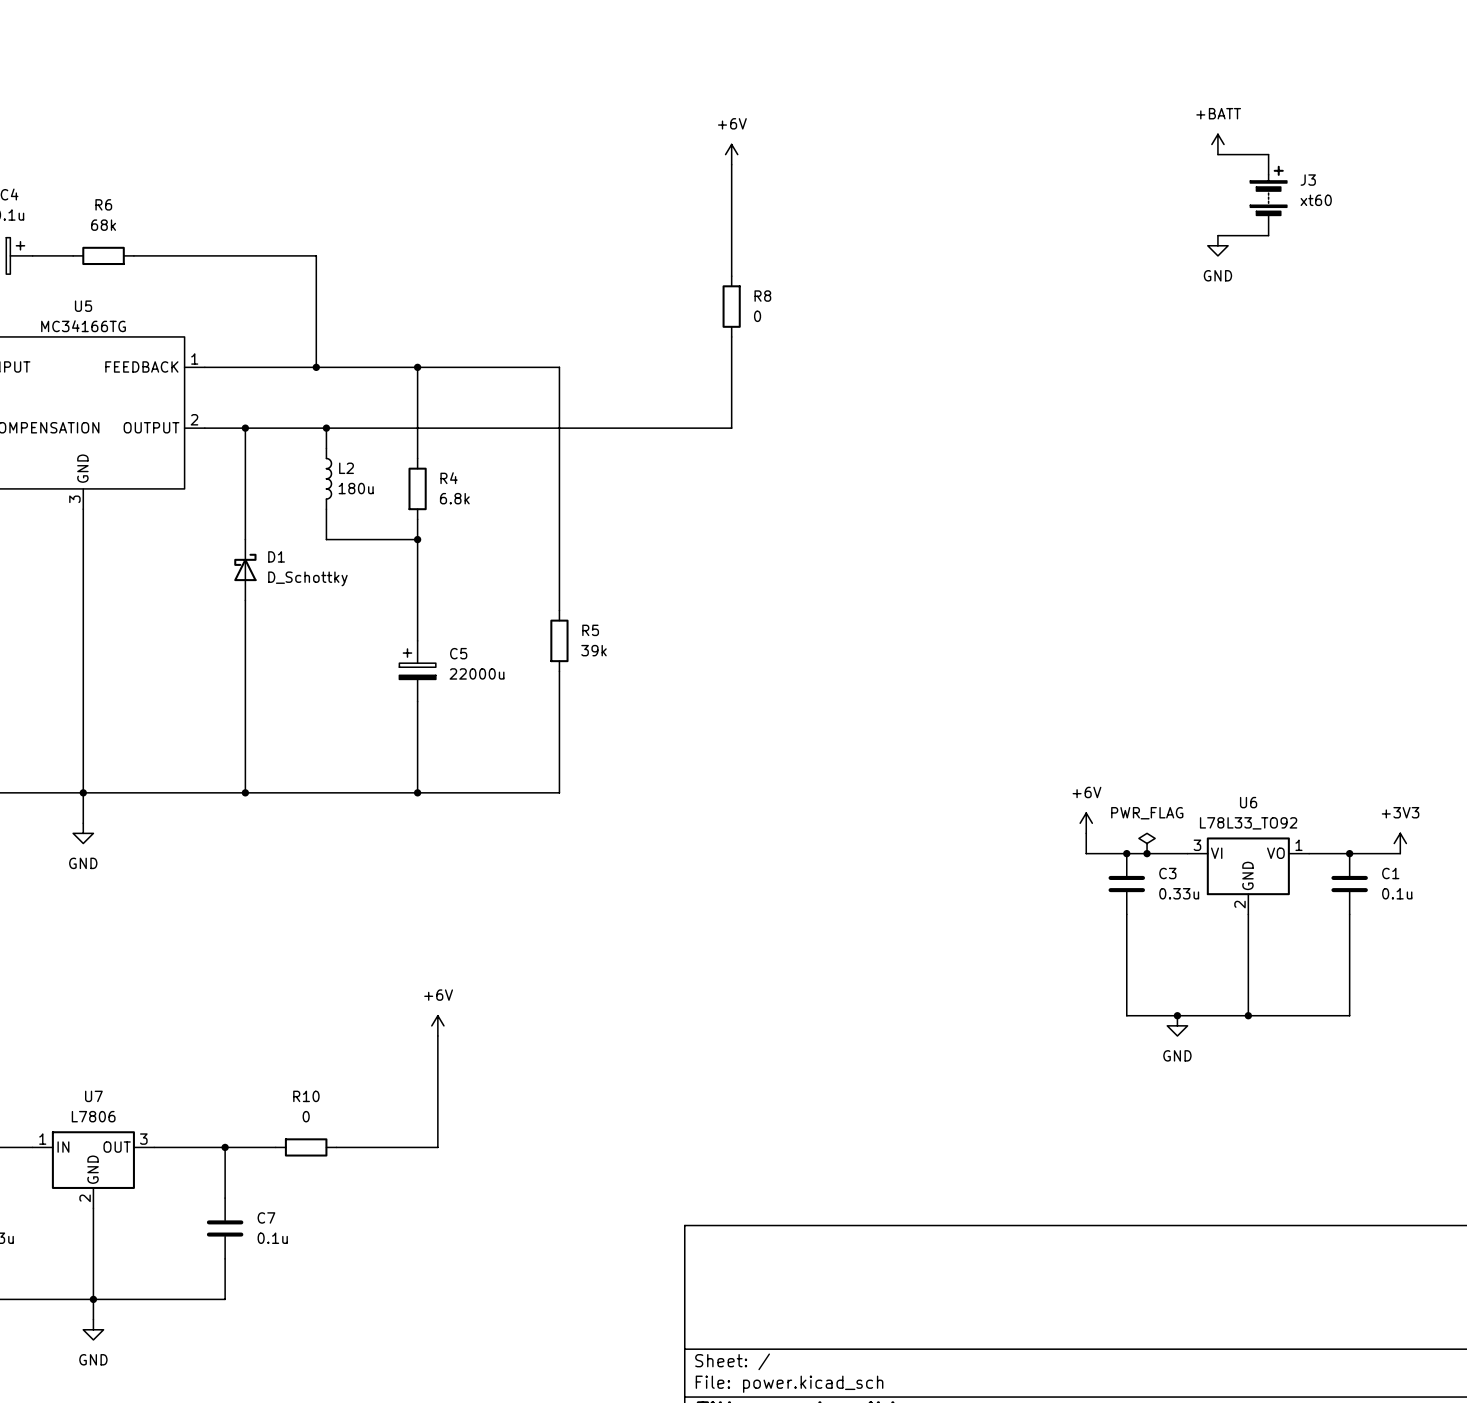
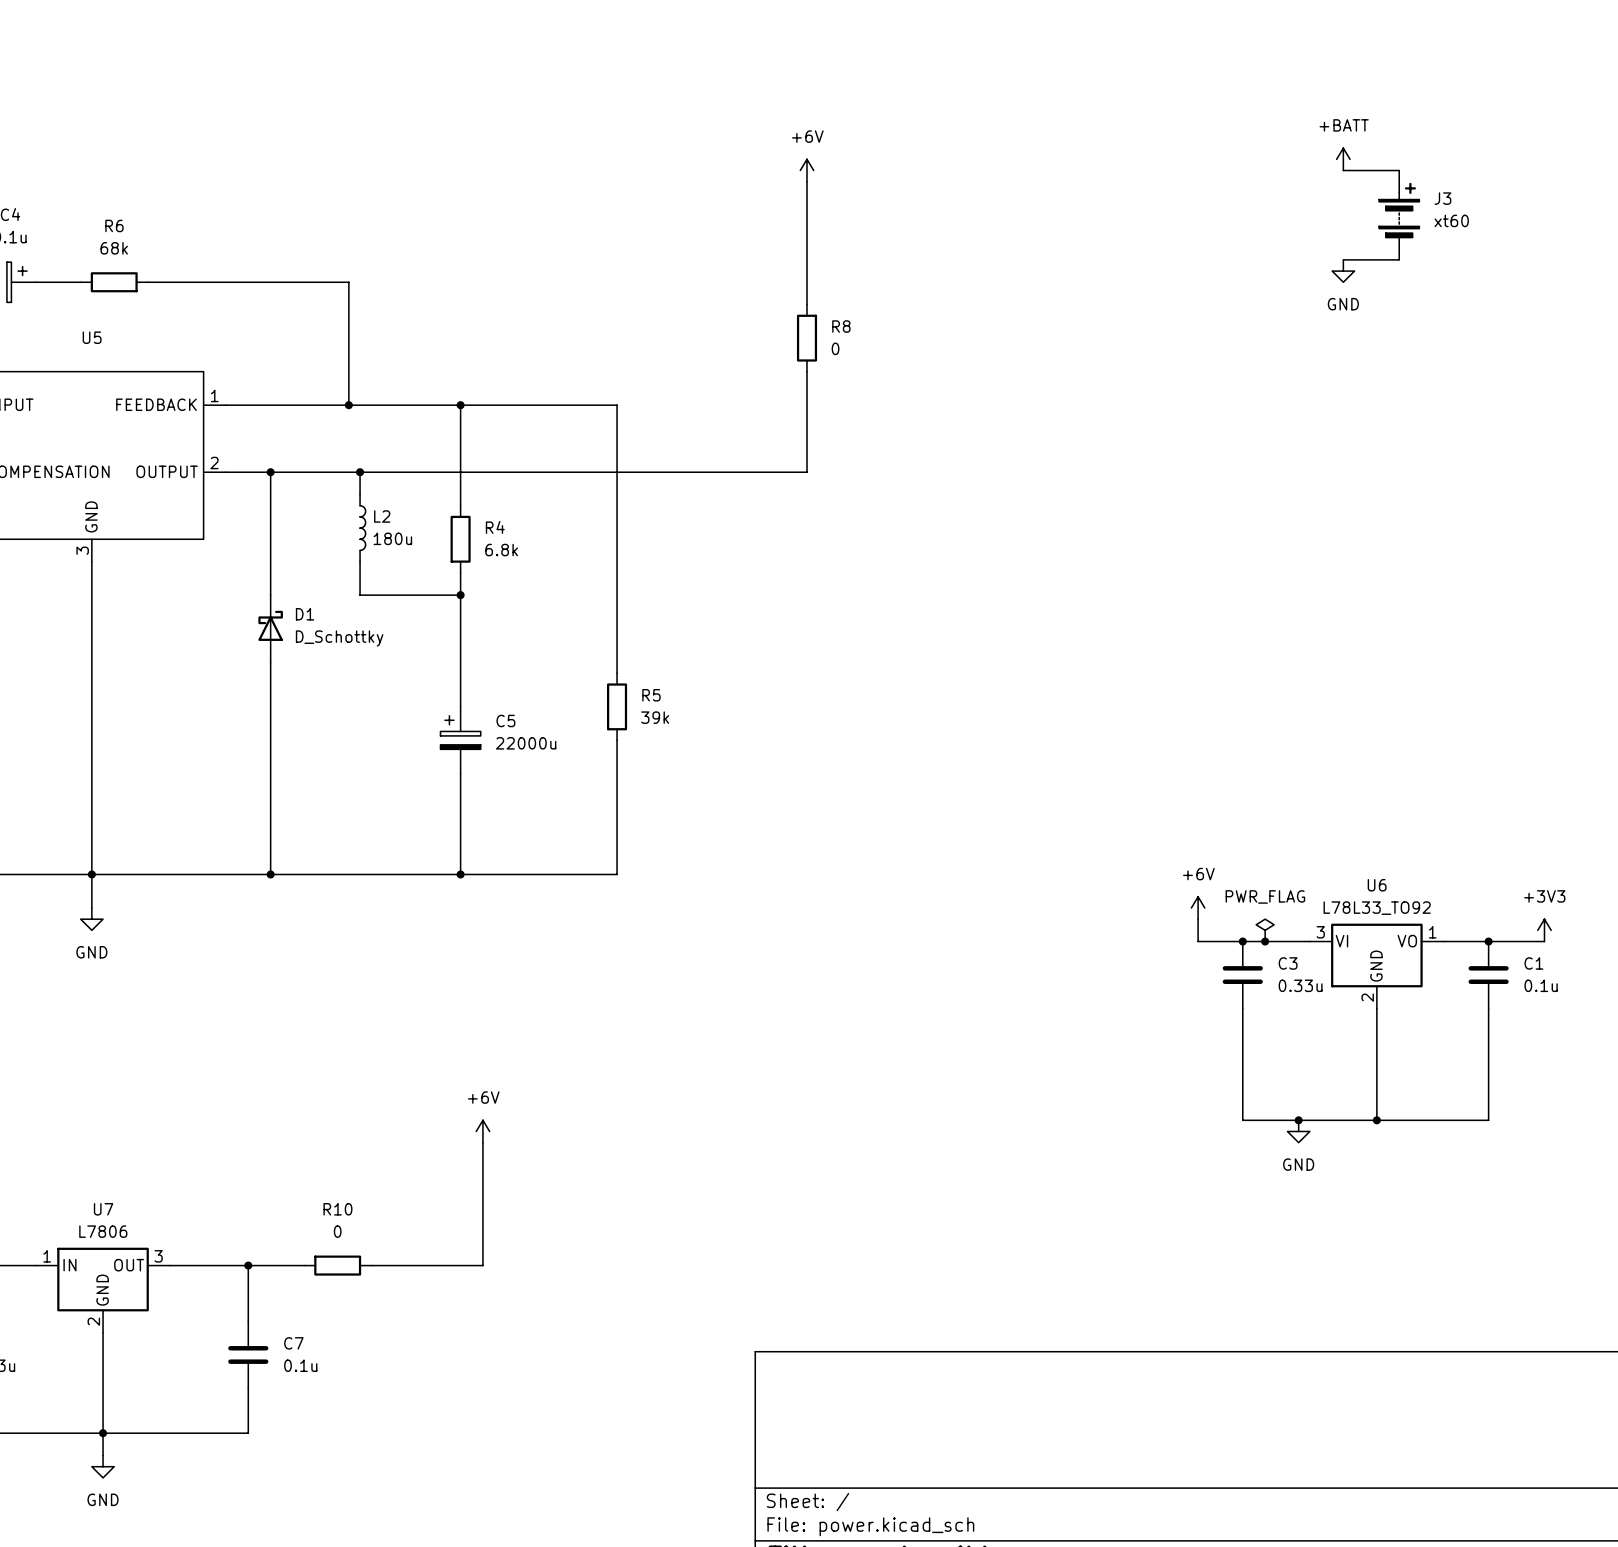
U5 value: MC34166TG (83, 326) -> none

